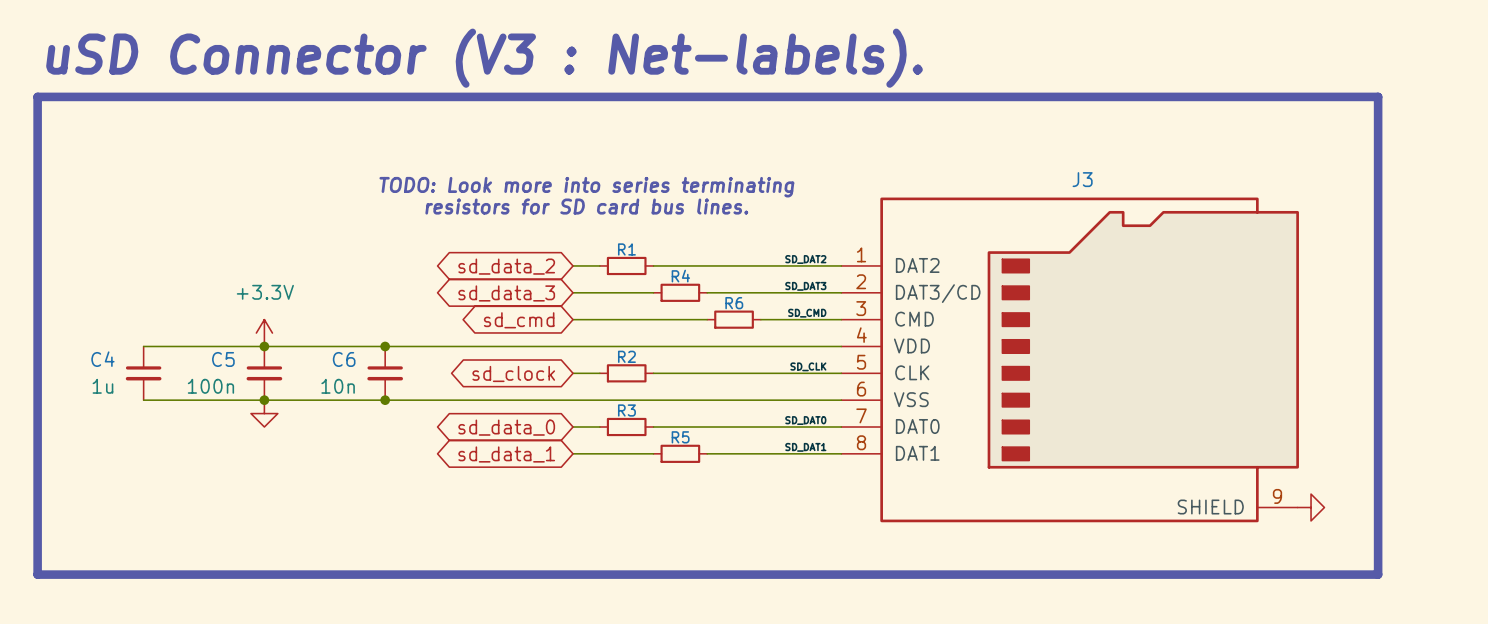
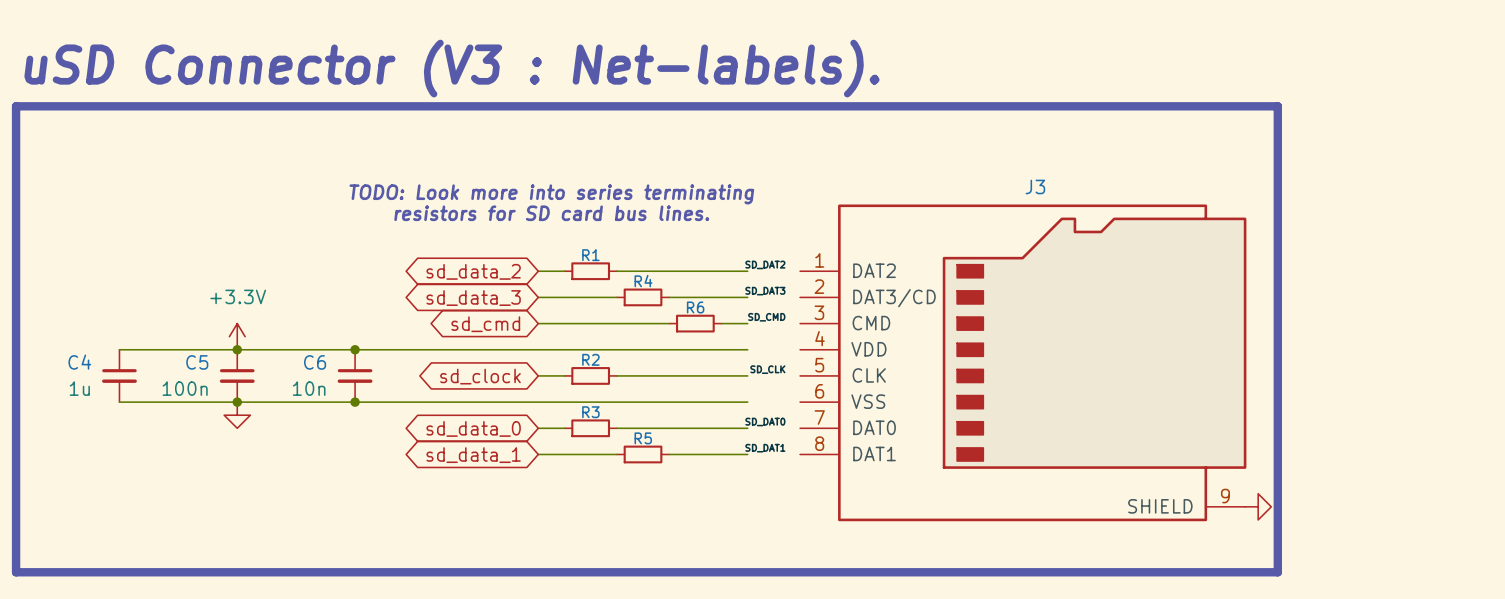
line: (1331, 96) (1378, 96) (1378, 574) (1331, 574) -> (1277, 106) (1277, 572)
wire: (787, 265) (841, 265) -> none
wire: (787, 292) (841, 292) -> none
wire: (787, 319) (841, 319) -> none
wire: (787, 346) (841, 346) -> none
wire: (787, 373) (841, 373) -> none
wire: (787, 400) (841, 400) -> none
wire: (787, 427) (841, 427) -> none
wire: (787, 453) (841, 453) -> none

